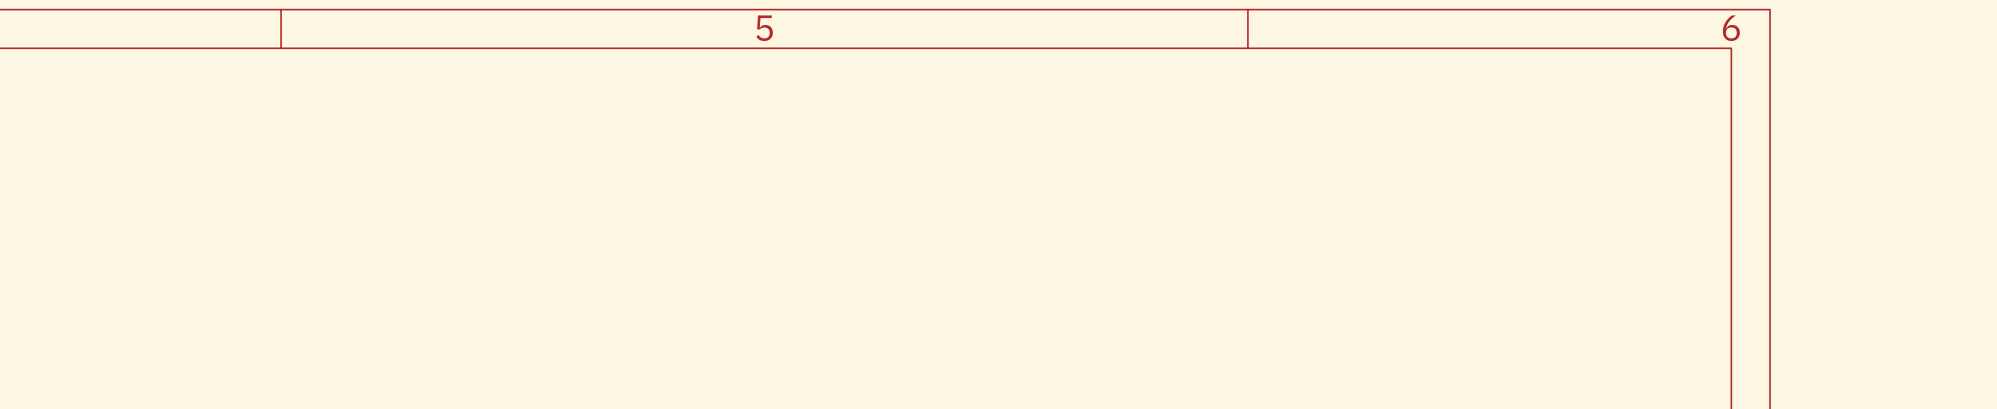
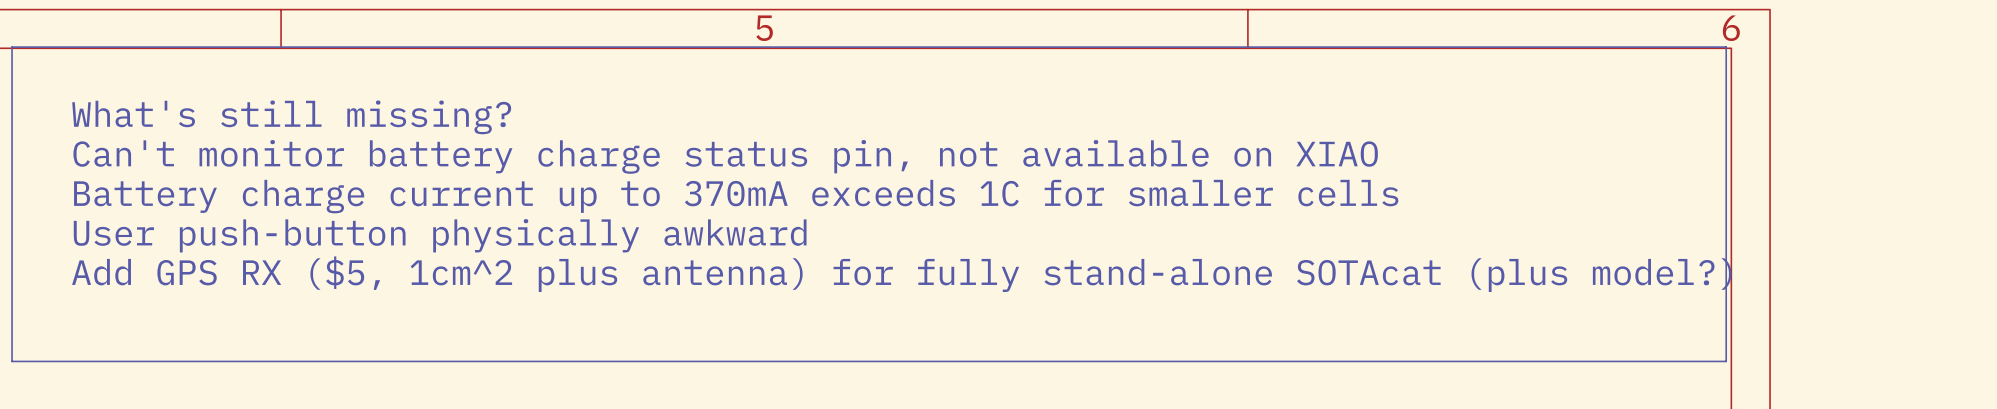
line: none -> (12, 47) (1726, 47) (1726, 361) (12, 361) (12, 47)
text: none -> What's still missing? (291, 117)
text: none -> Can't monitor battery charge status pin, not available on XIAO (725, 156)
text: none -> Battery charge current up to 370mA exceeds 1C for smaller cells (736, 196)
text: none -> User push-button physically awkward (440, 235)
text: none -> Add GPS RX ($5, 1cm^2 plus antenna) for fully stand-alone SOTAcat (plus model?) (901, 274)

